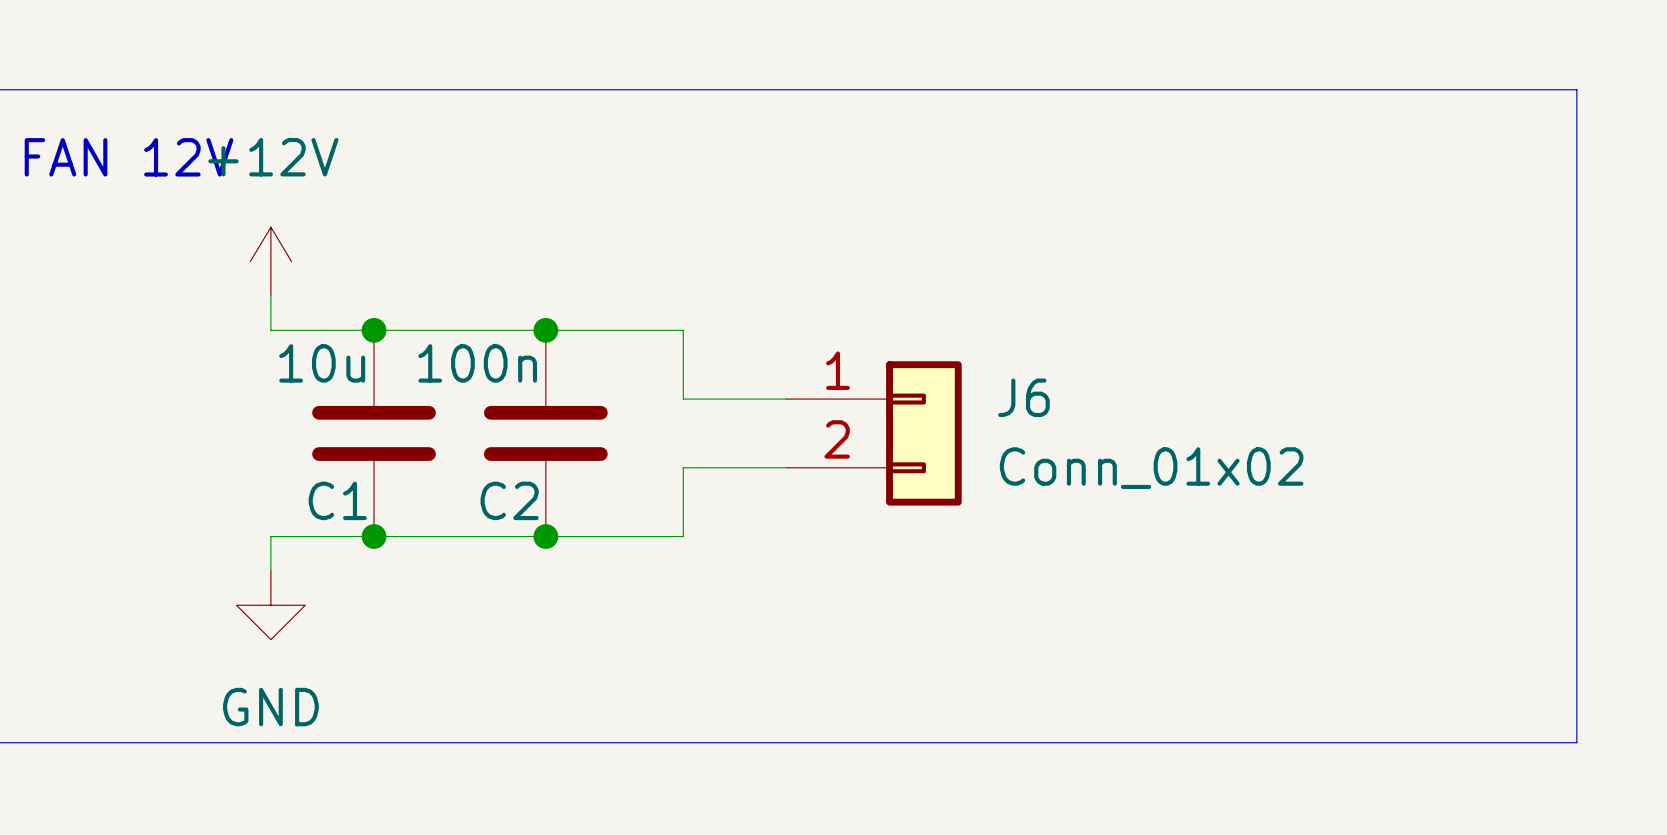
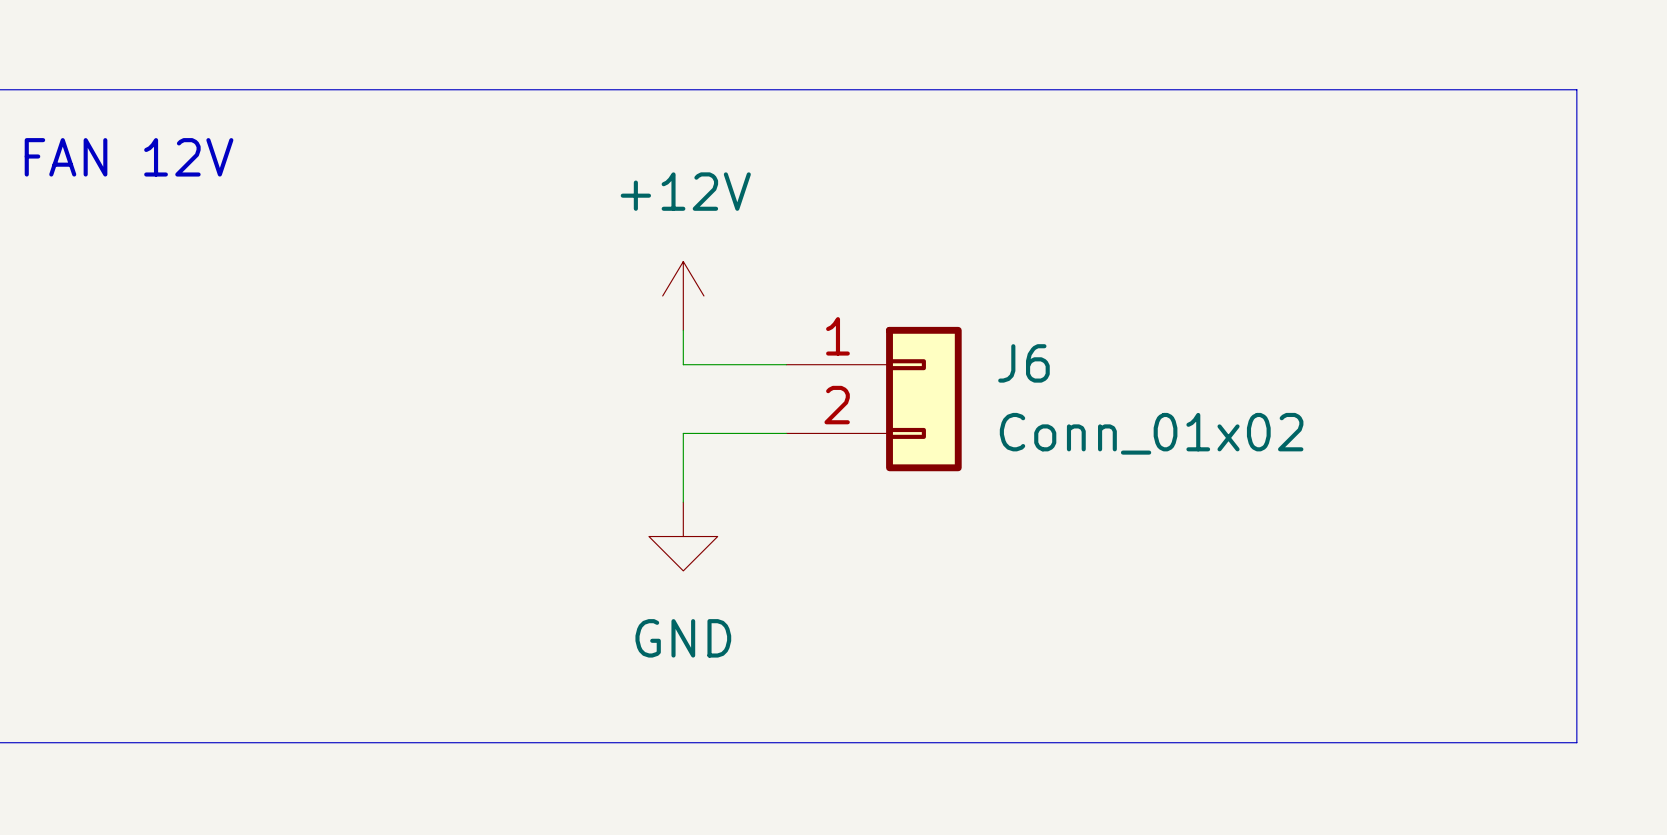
power symbol position: +12V (270, 261) -> +12V (683, 295)
wire: (270, 295) (270, 330) (683, 330) -> none
junction: (374, 330) -> none
junction: (545, 330) -> none
wire: (683, 364) (683, 399) (786, 399) -> (683, 364) (786, 364)
C1: 10u (374, 433) -> none
C2: 100n (545, 433) -> none
J6 position: (874, 433) -> (874, 399)
wire: (683, 467) (786, 467) -> (683, 467) (683, 433) (786, 433)
wire: (683, 502) (683, 536) (270, 536) (270, 570) -> none
junction: (374, 536) -> none
junction: (545, 536) -> none
power symbol position: GND (270, 605) -> GND (683, 536)

